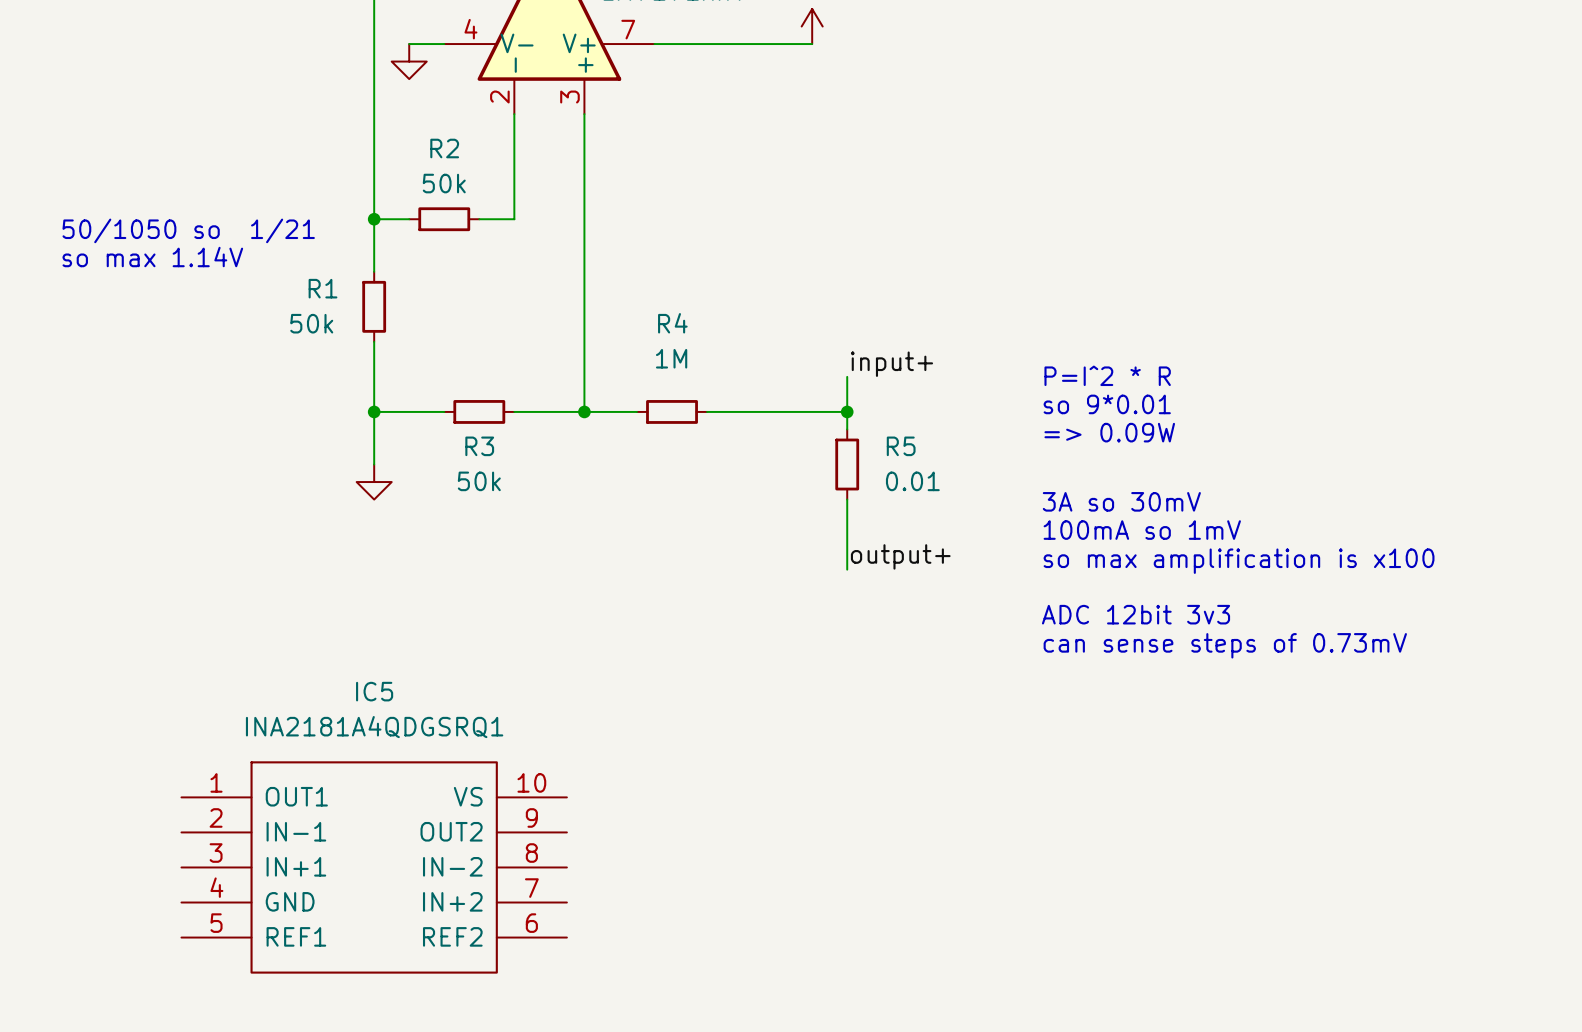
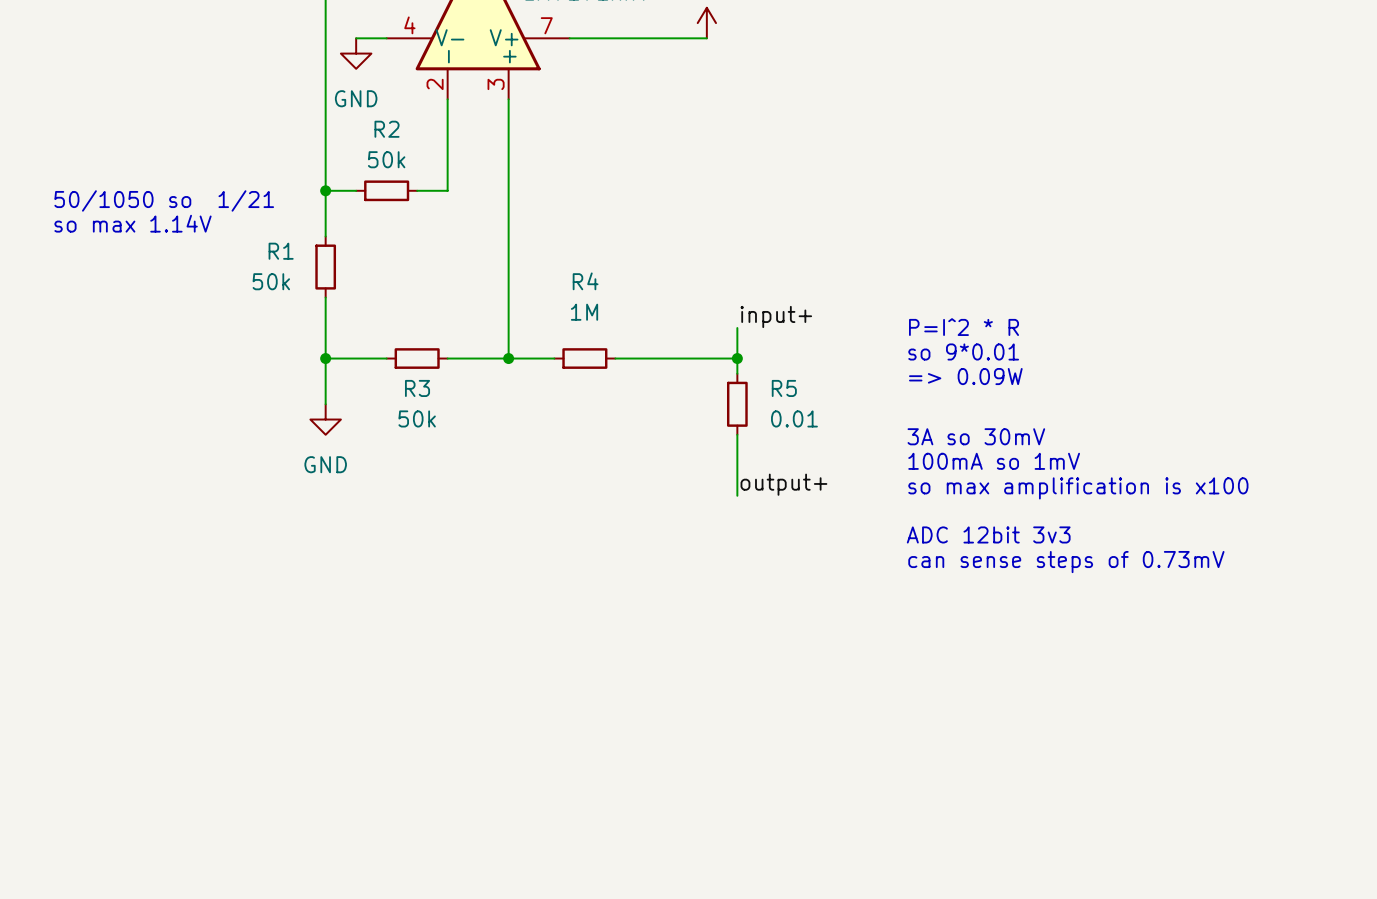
power symbol text: none -> GND (356, 98)
power symbol text: none -> GND (325, 464)
IC5: INA2181A4QDGSRQ1 (374, 867) -> none

